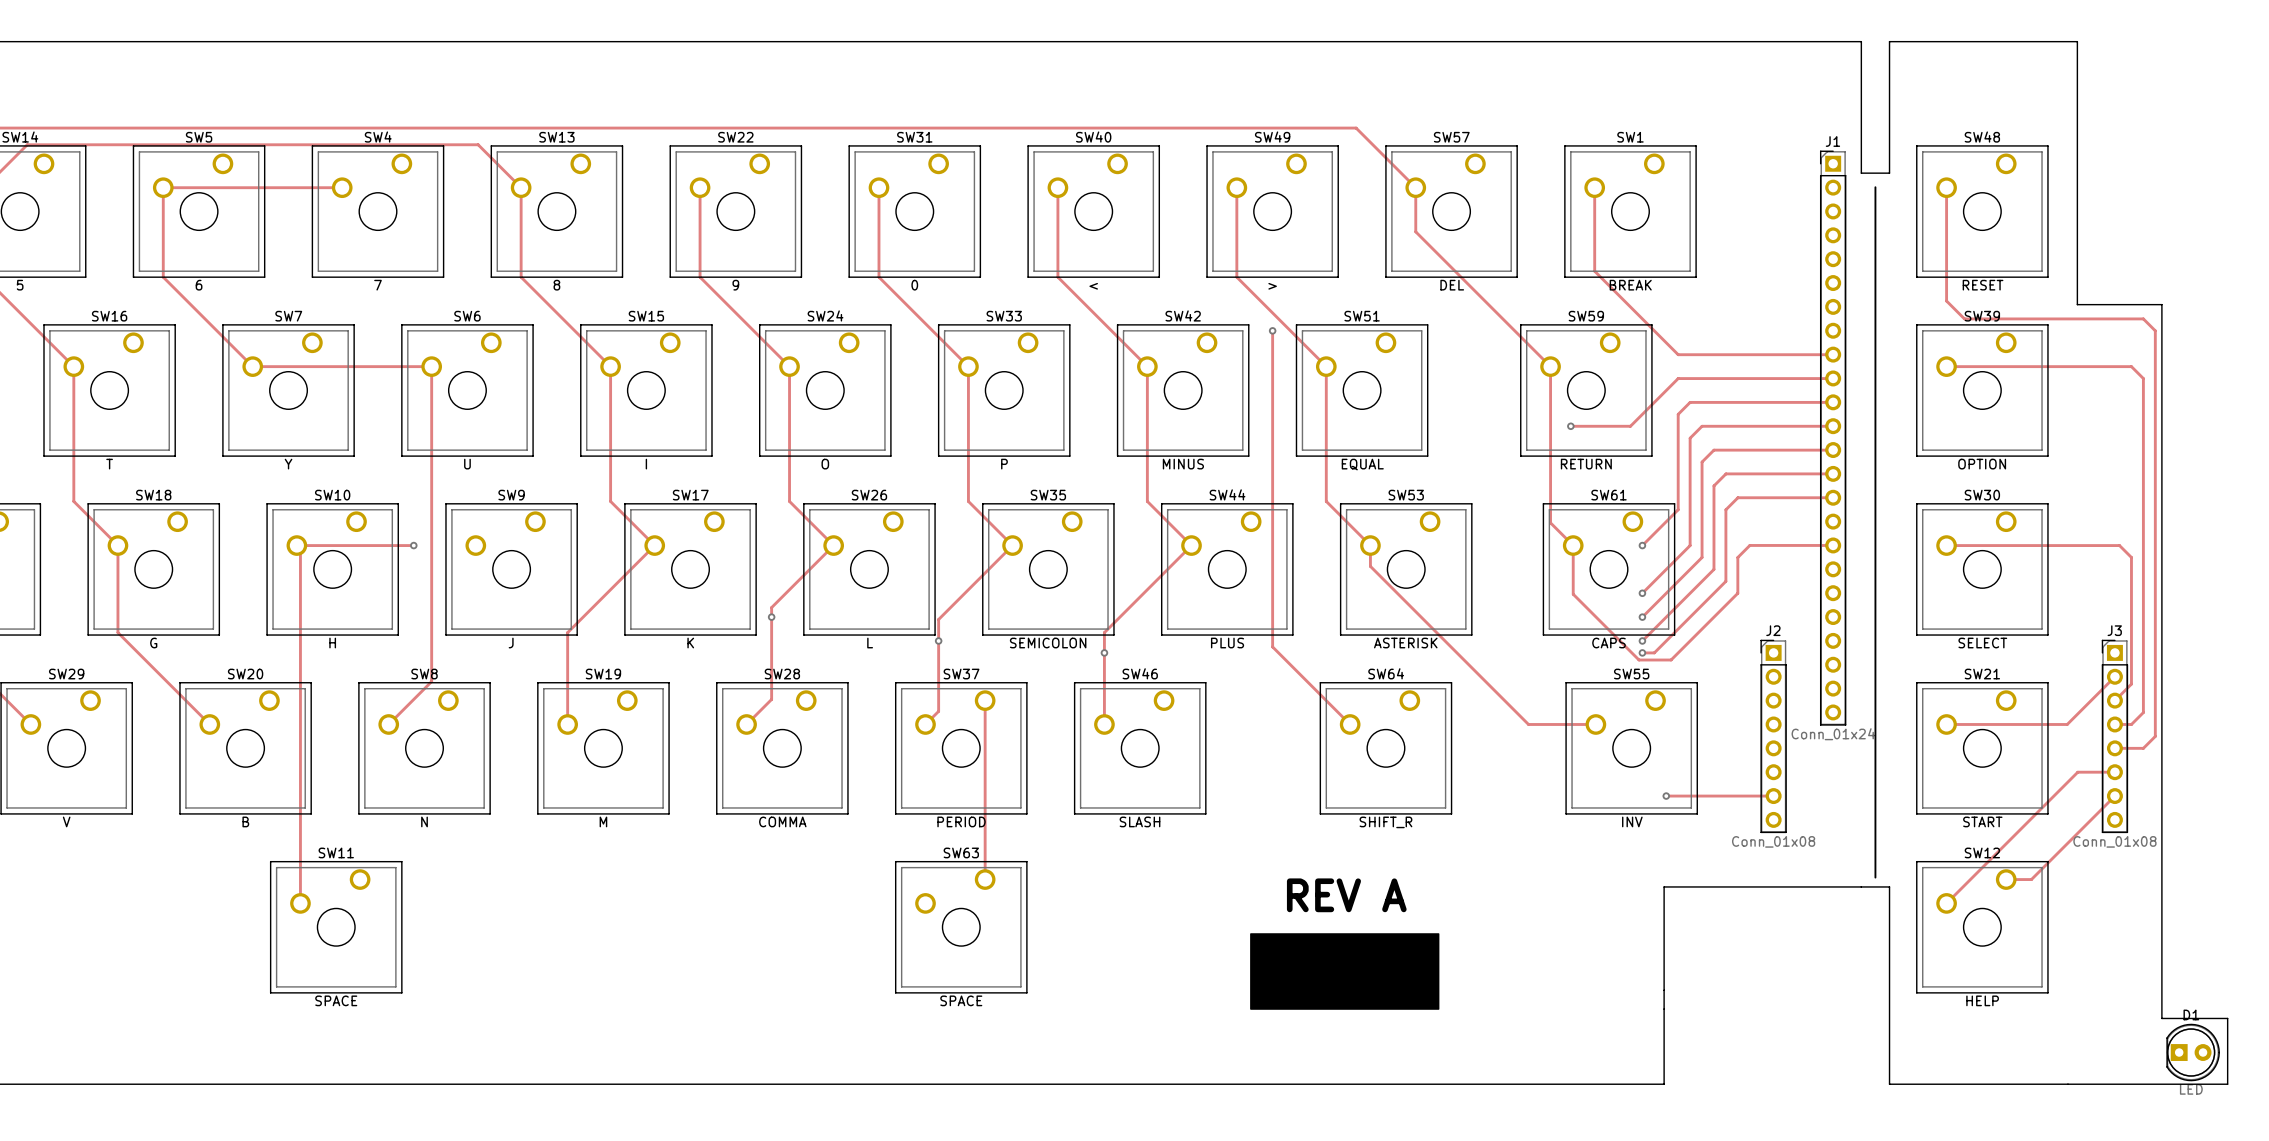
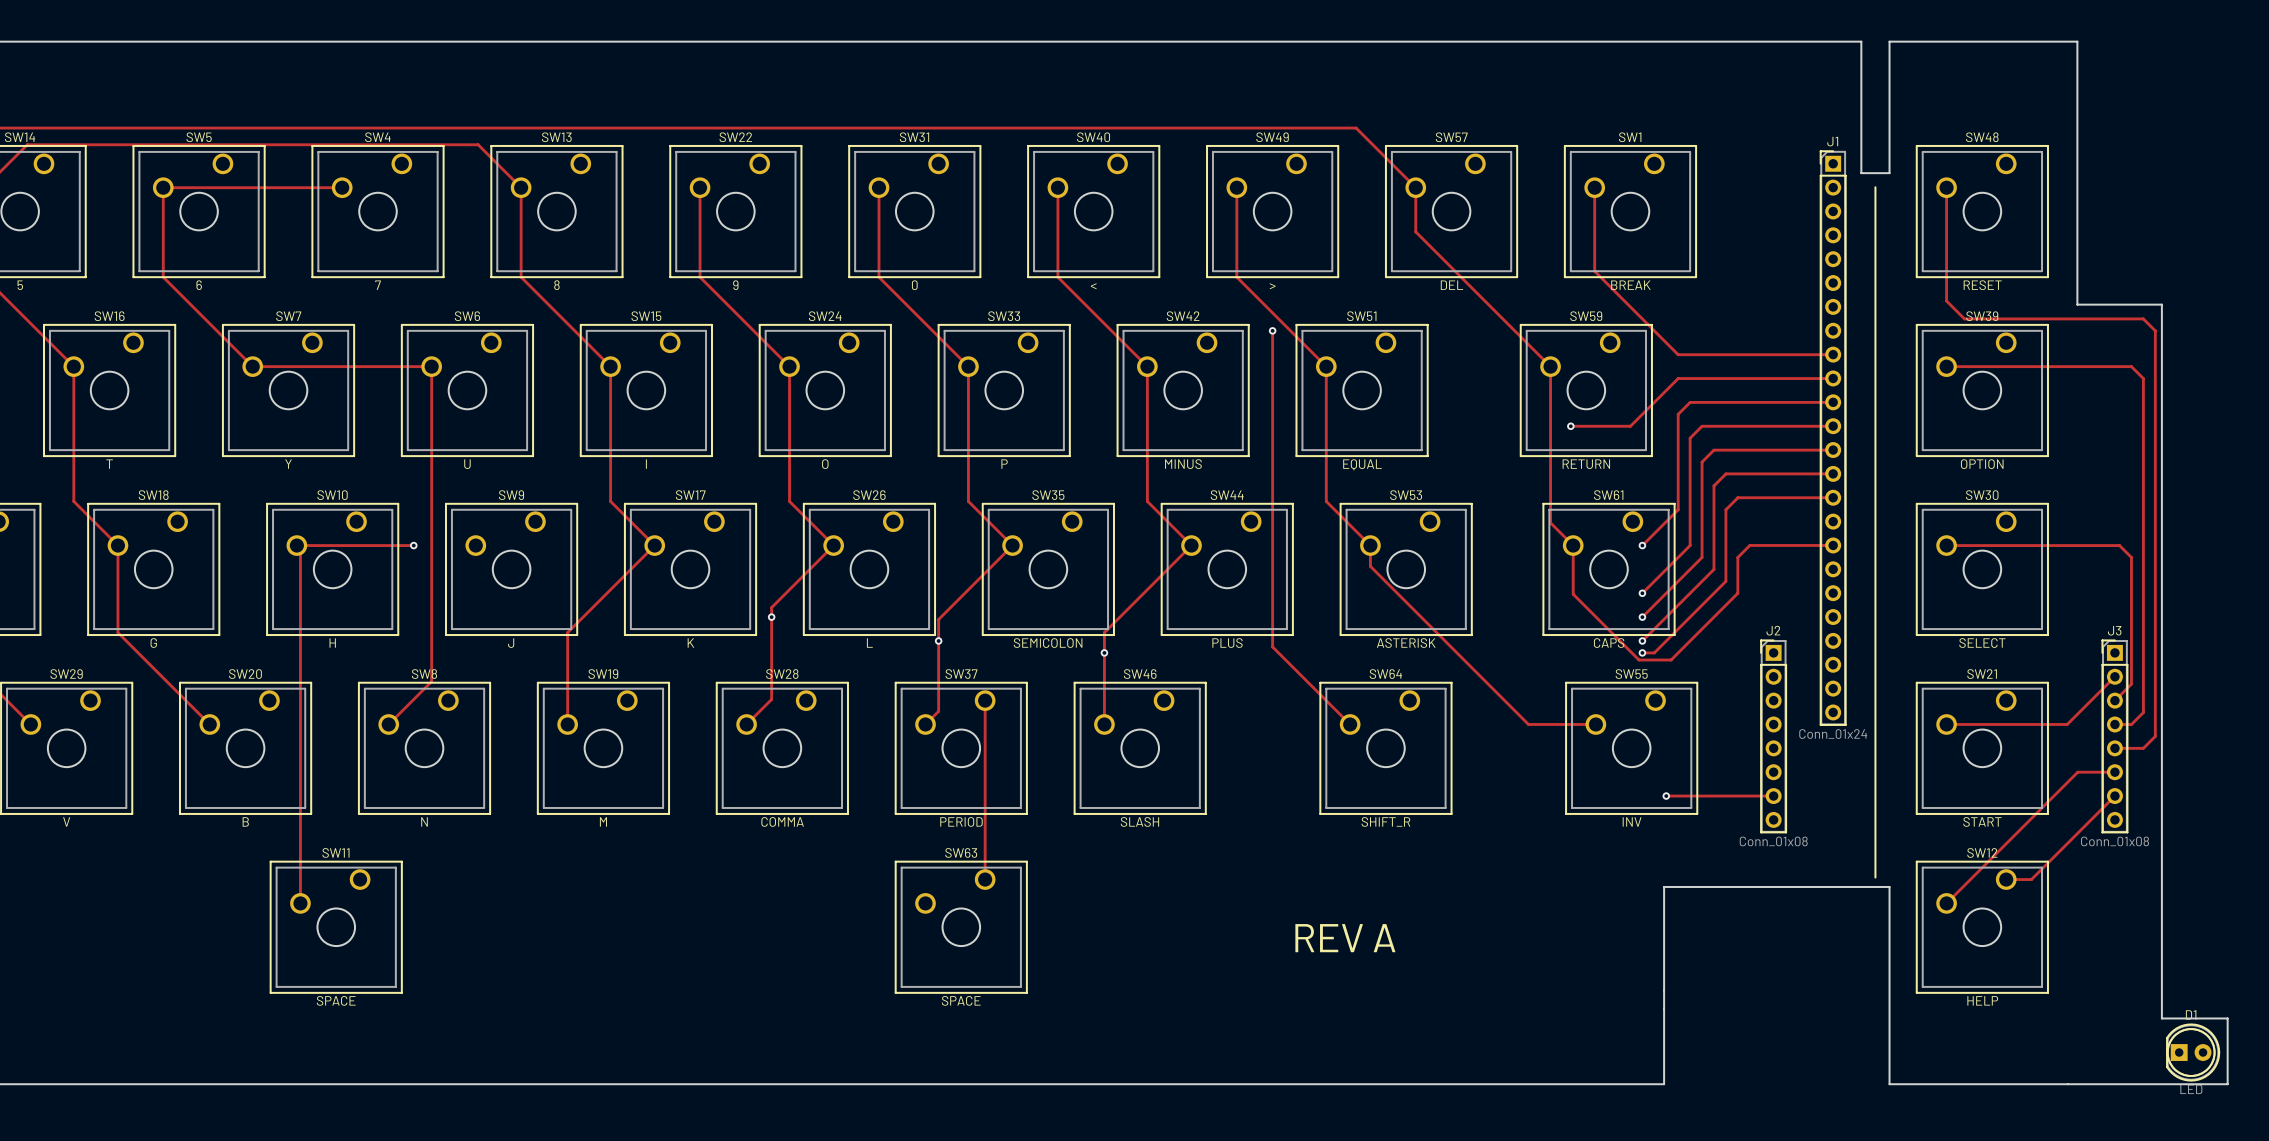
text position: REV A (1346, 895) -> REV A (1345, 938)
drawing: [1250, 933, 1440, 1010] -> none

